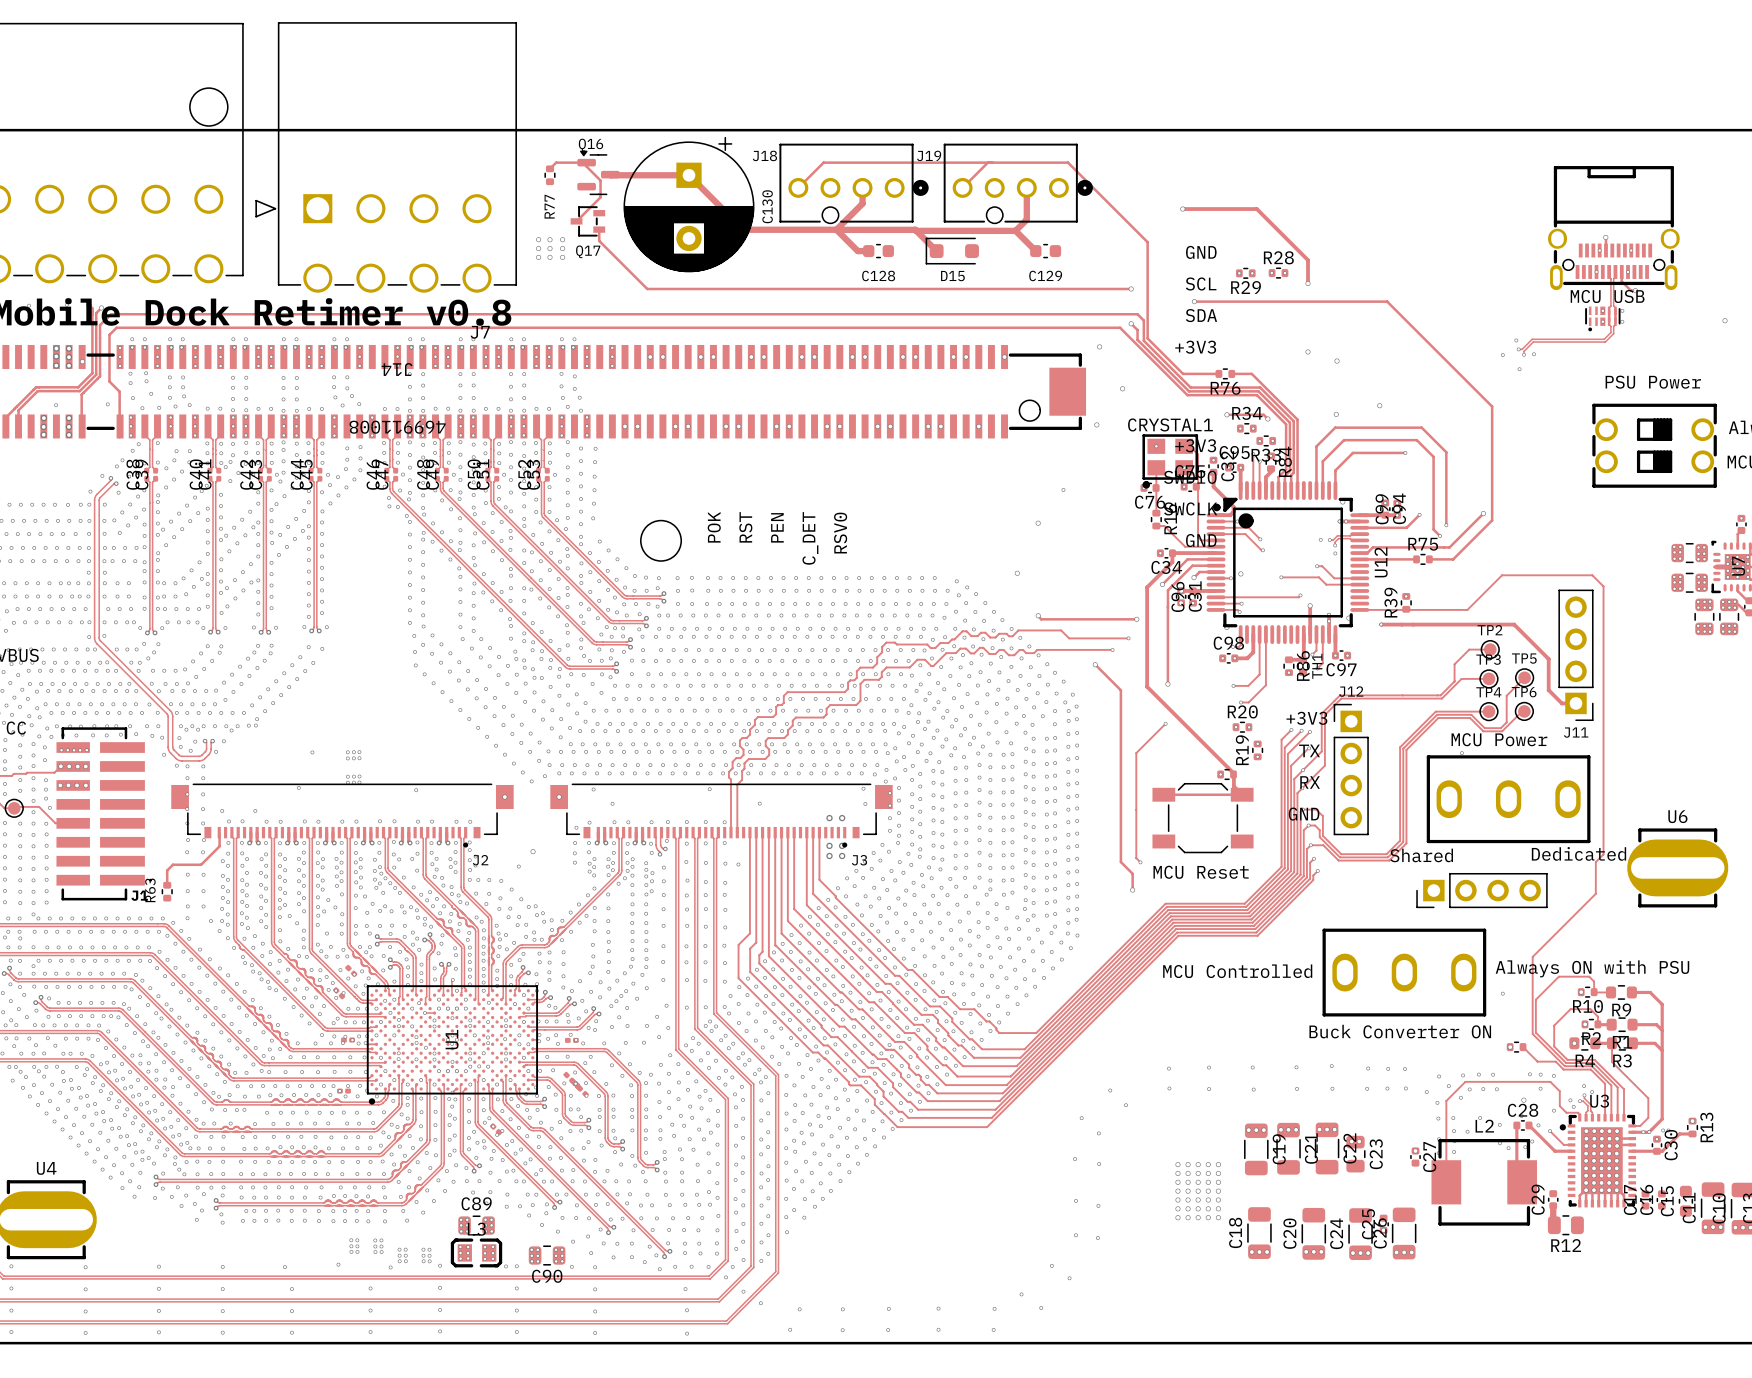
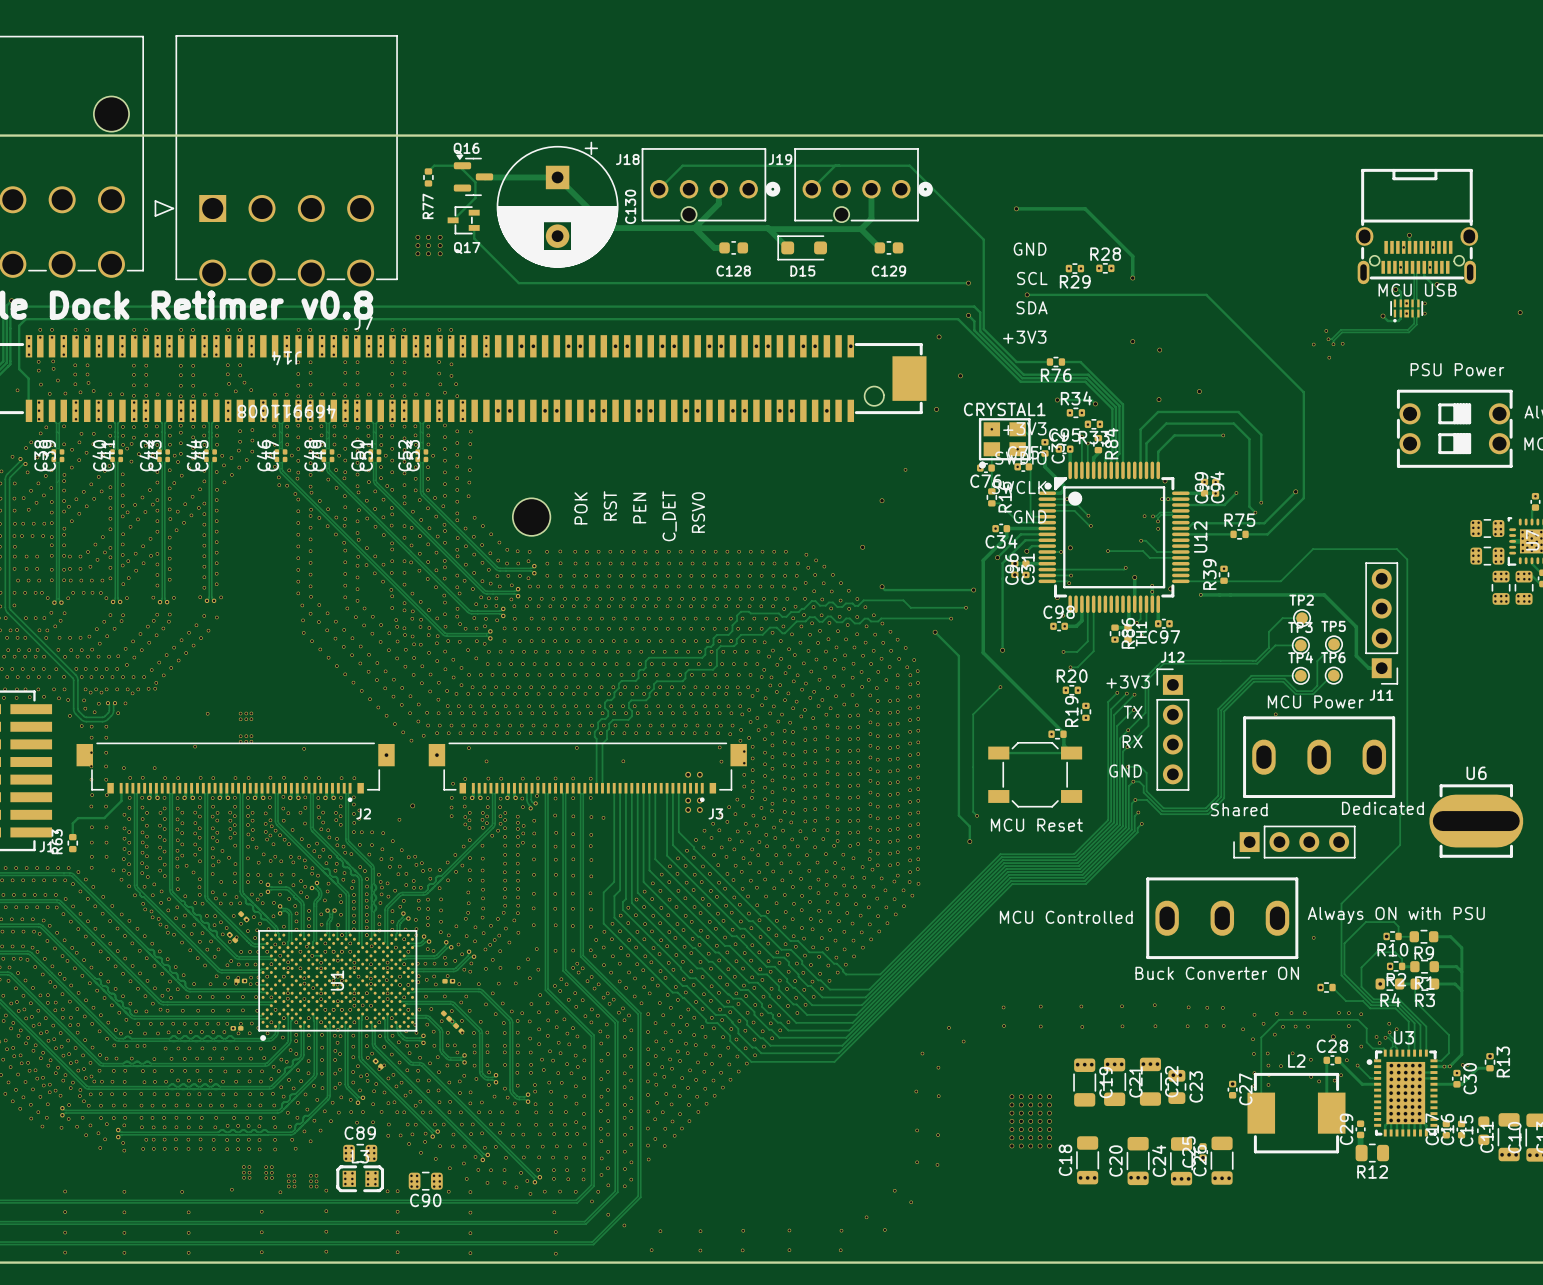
track: none -> (1395, 289) (1400, 291) (1400, 318) (1398, 320) (1387, 320) (1383, 316)
via: none -> (1395, 289)
via: none -> (1383, 316)

